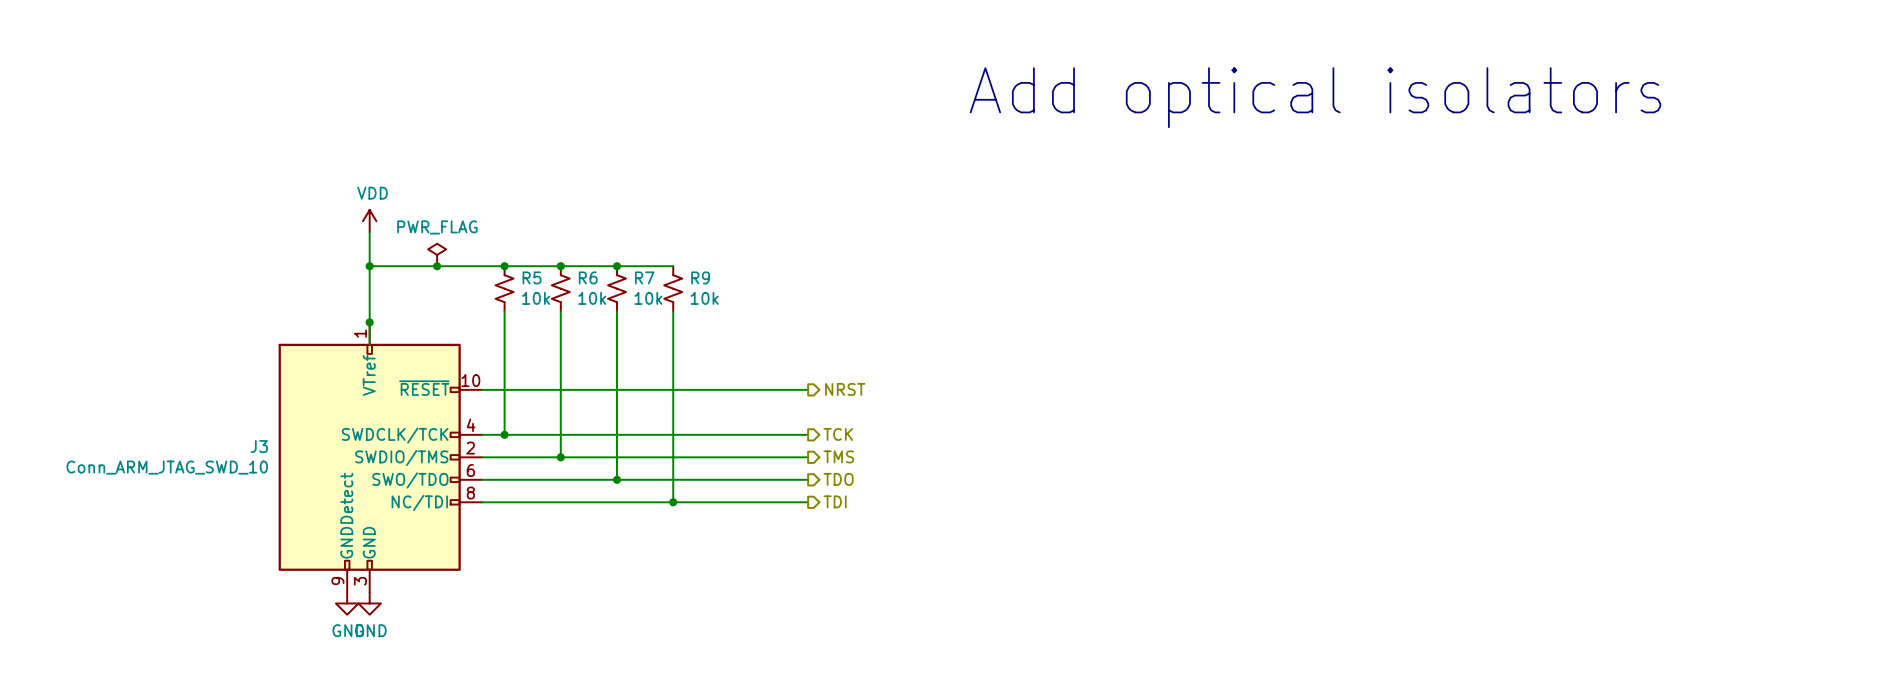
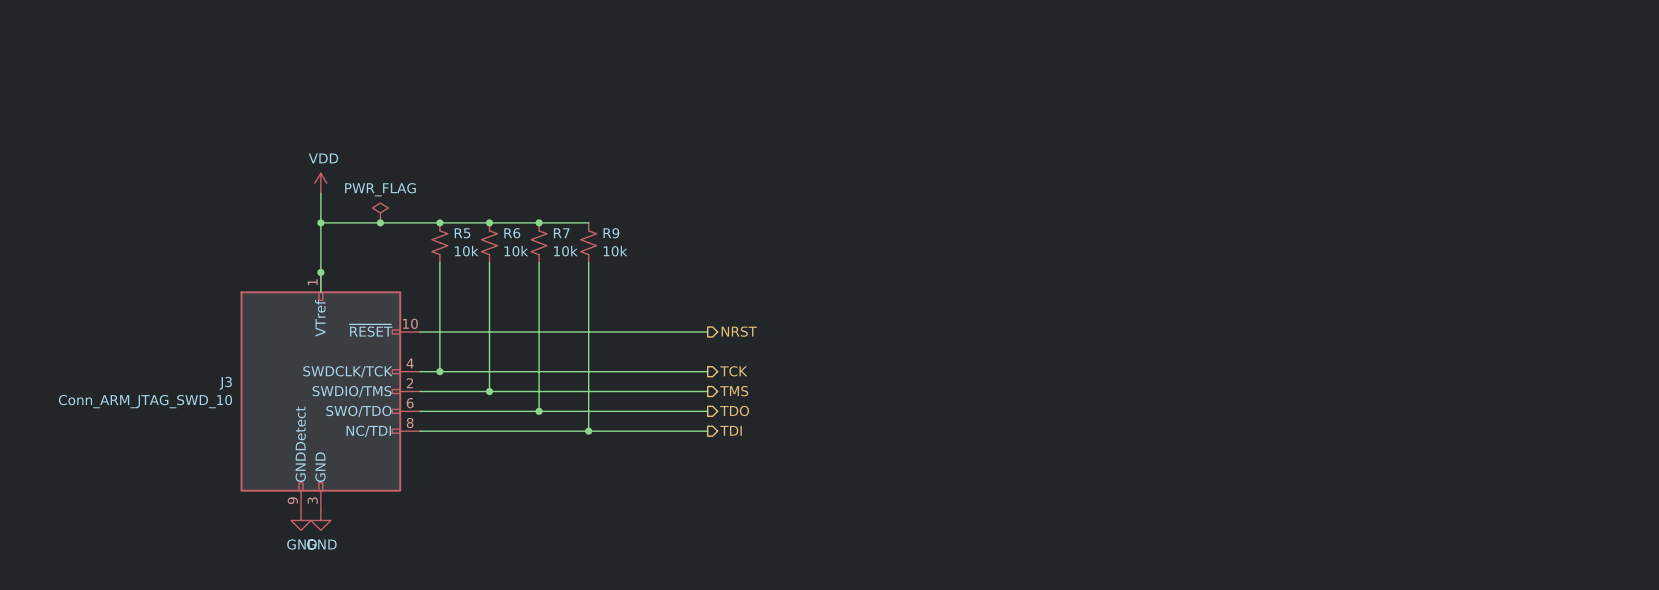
text: Add optical isolators (1315, 97) -> none

